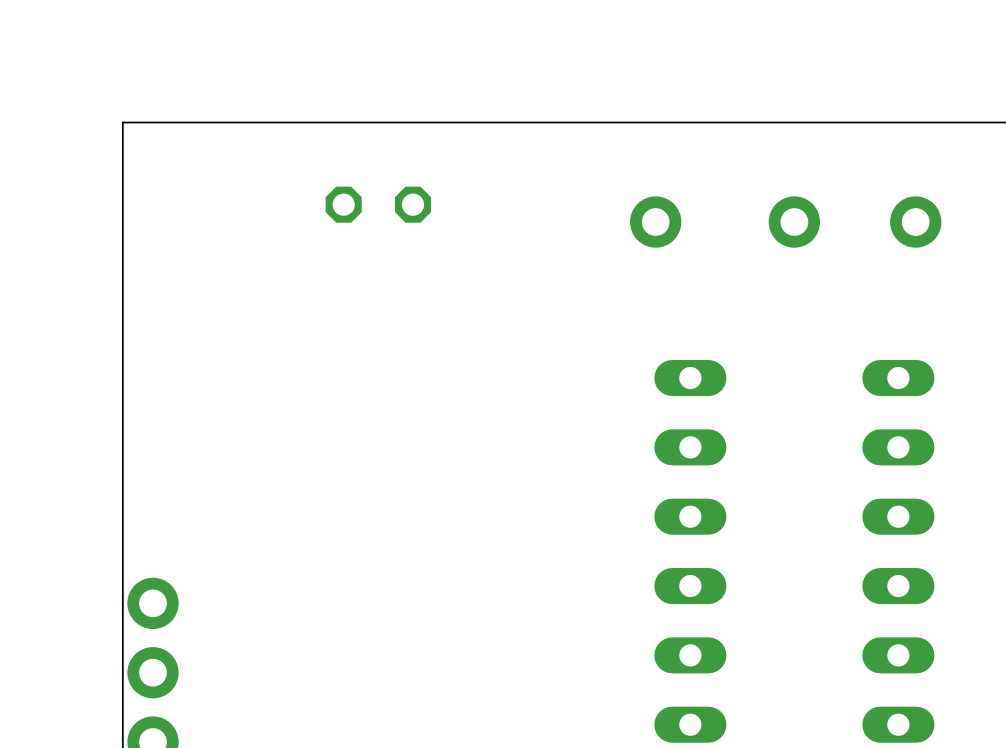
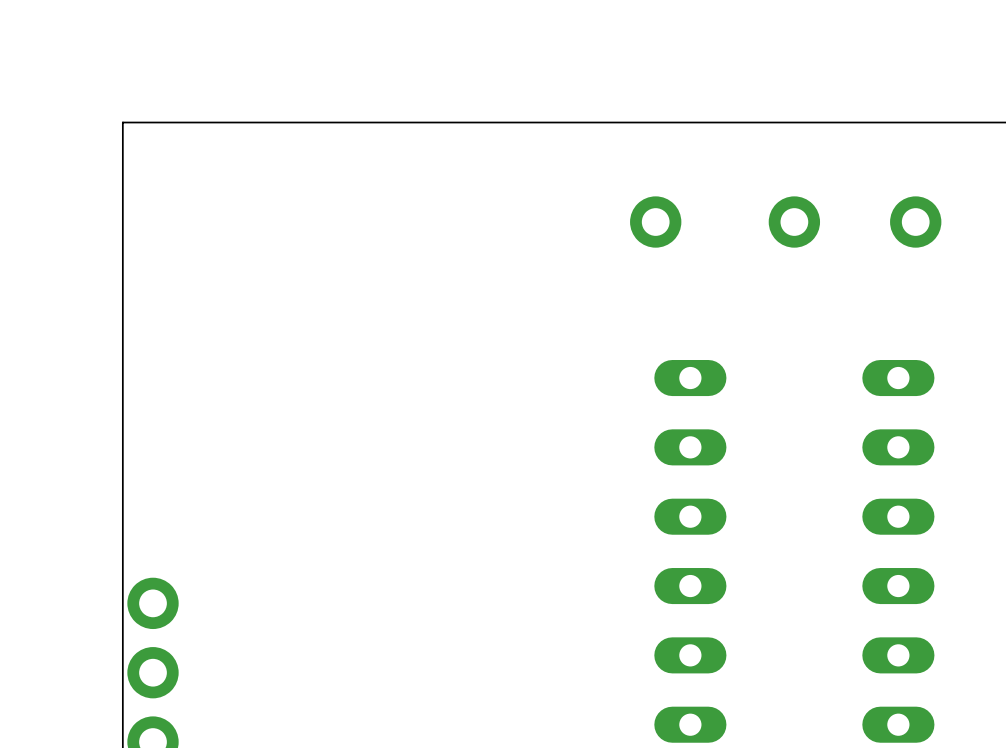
part: (378, 204) -> none

